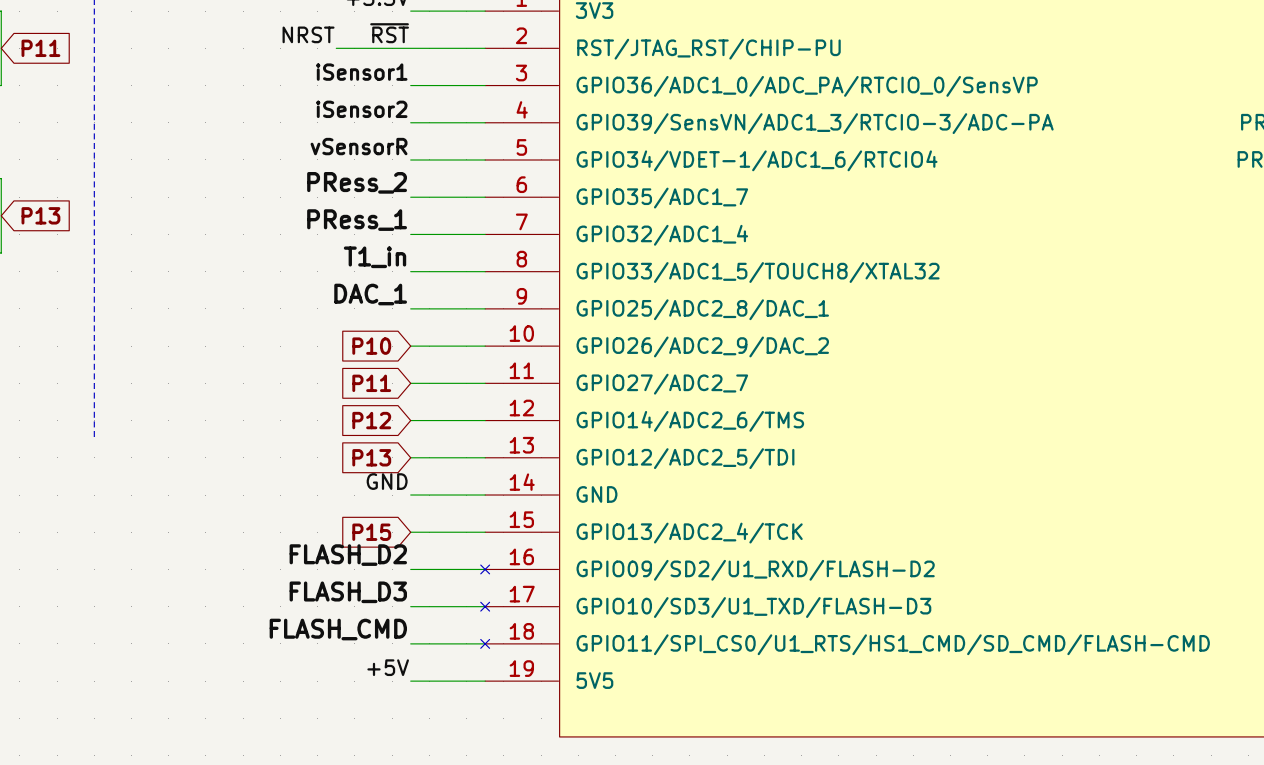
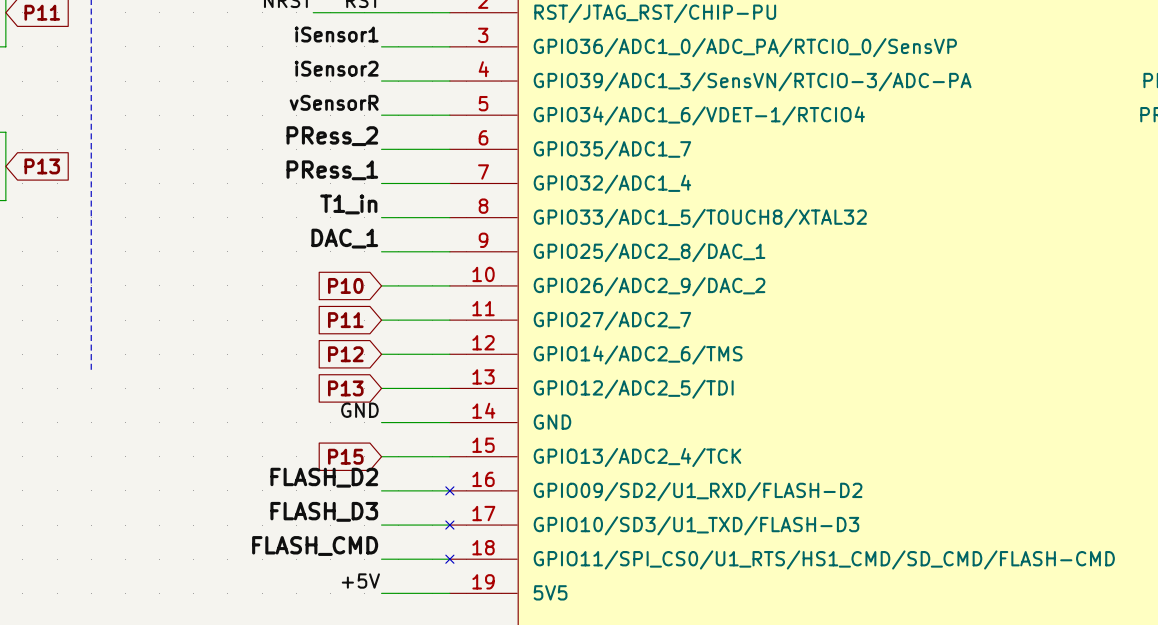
part pin name: GPIO39/SensVN/ADC1_3/RTCIO-3/ADC-PA (815, 123) -> GPIO39/ADC1_3/SensVN/RTCIO-3/ADC-PA (752, 81)
part pin name: GPIO34/VDET-1/ADC1_6/RTCIO4 (757, 160) -> GPIO34/ADC1_6/VDET-1/RTCIO4 (699, 115)

